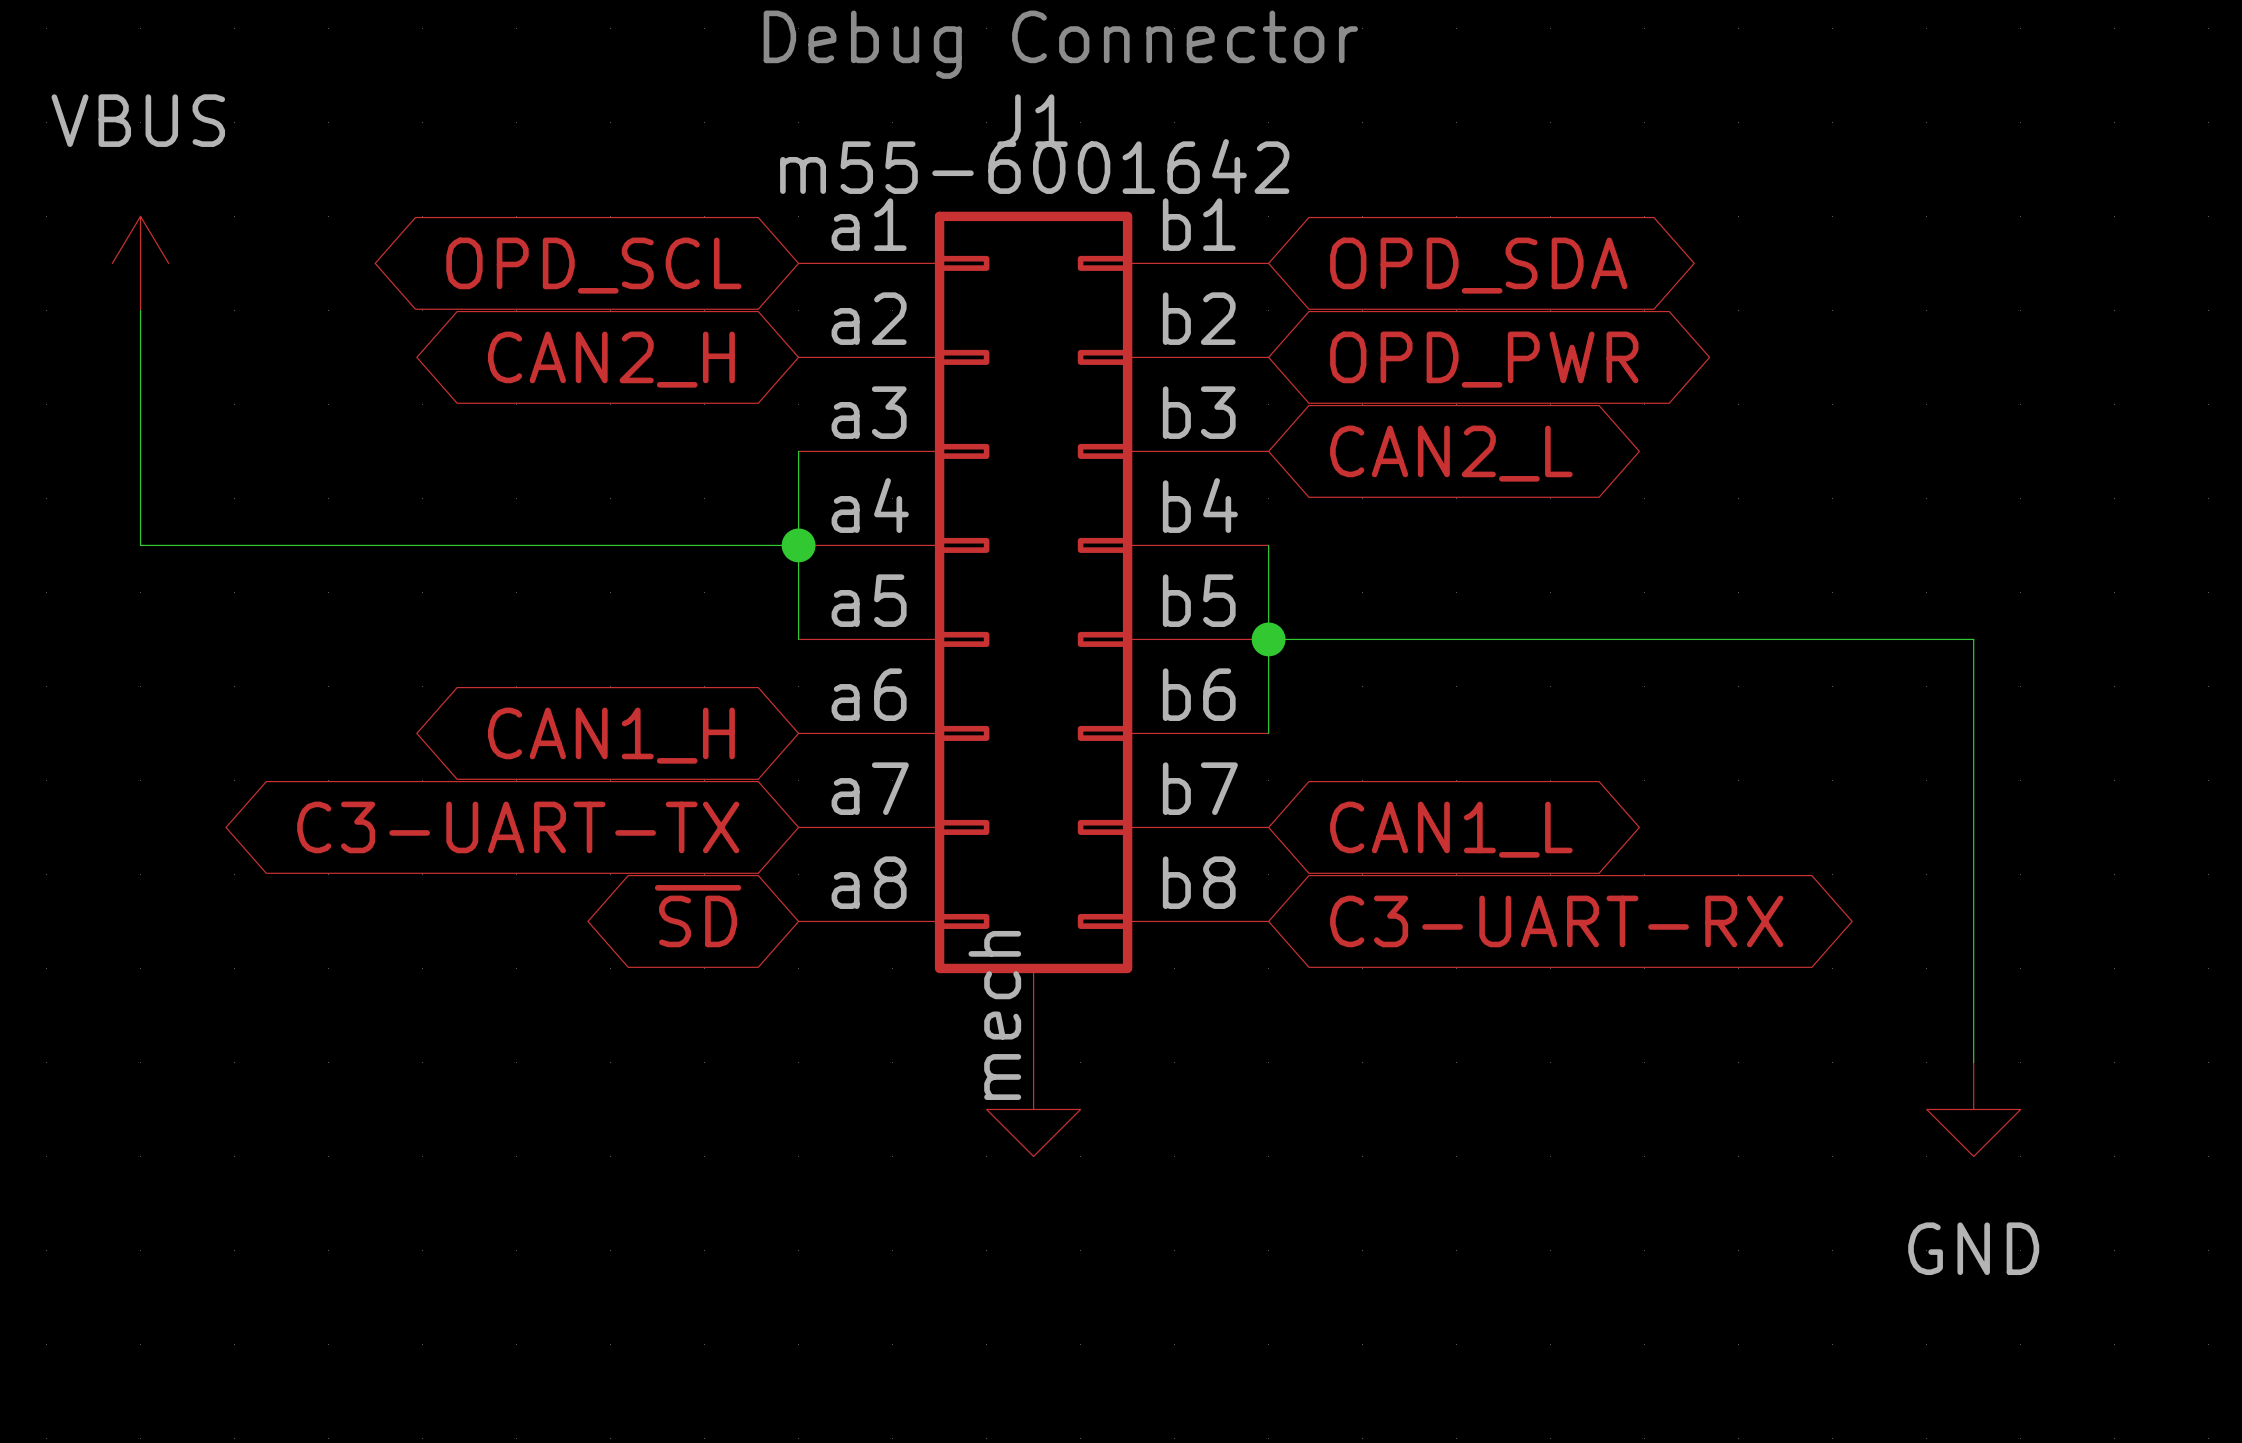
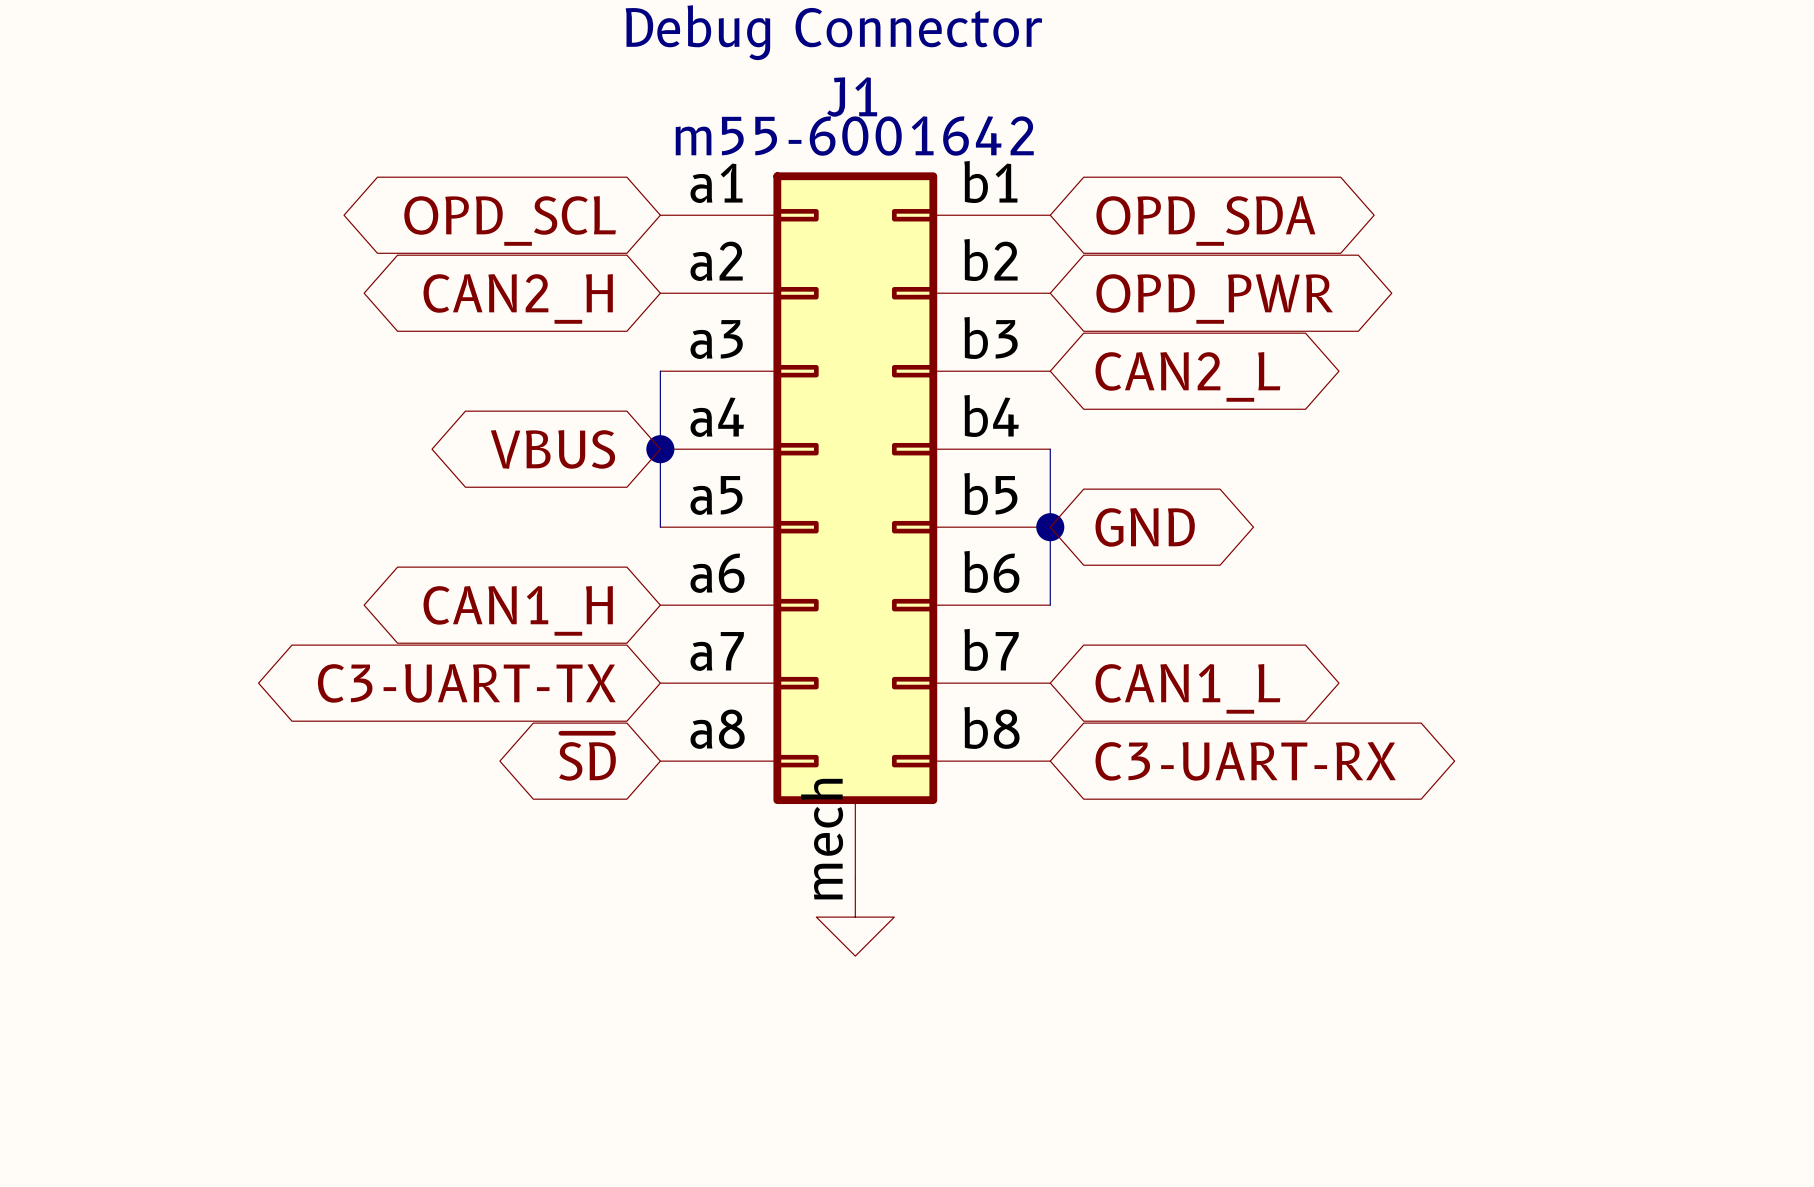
power symbol: VBUS (140, 263) -> none
wire: (140, 310) (140, 545) (798, 545) -> none
global label: none -> VBUS (552, 449)
wire: (1268, 639) (1973, 639) (1973, 1062) -> none
global label: none -> GND (1145, 527)
power symbol: GND (1973, 1109) -> none

